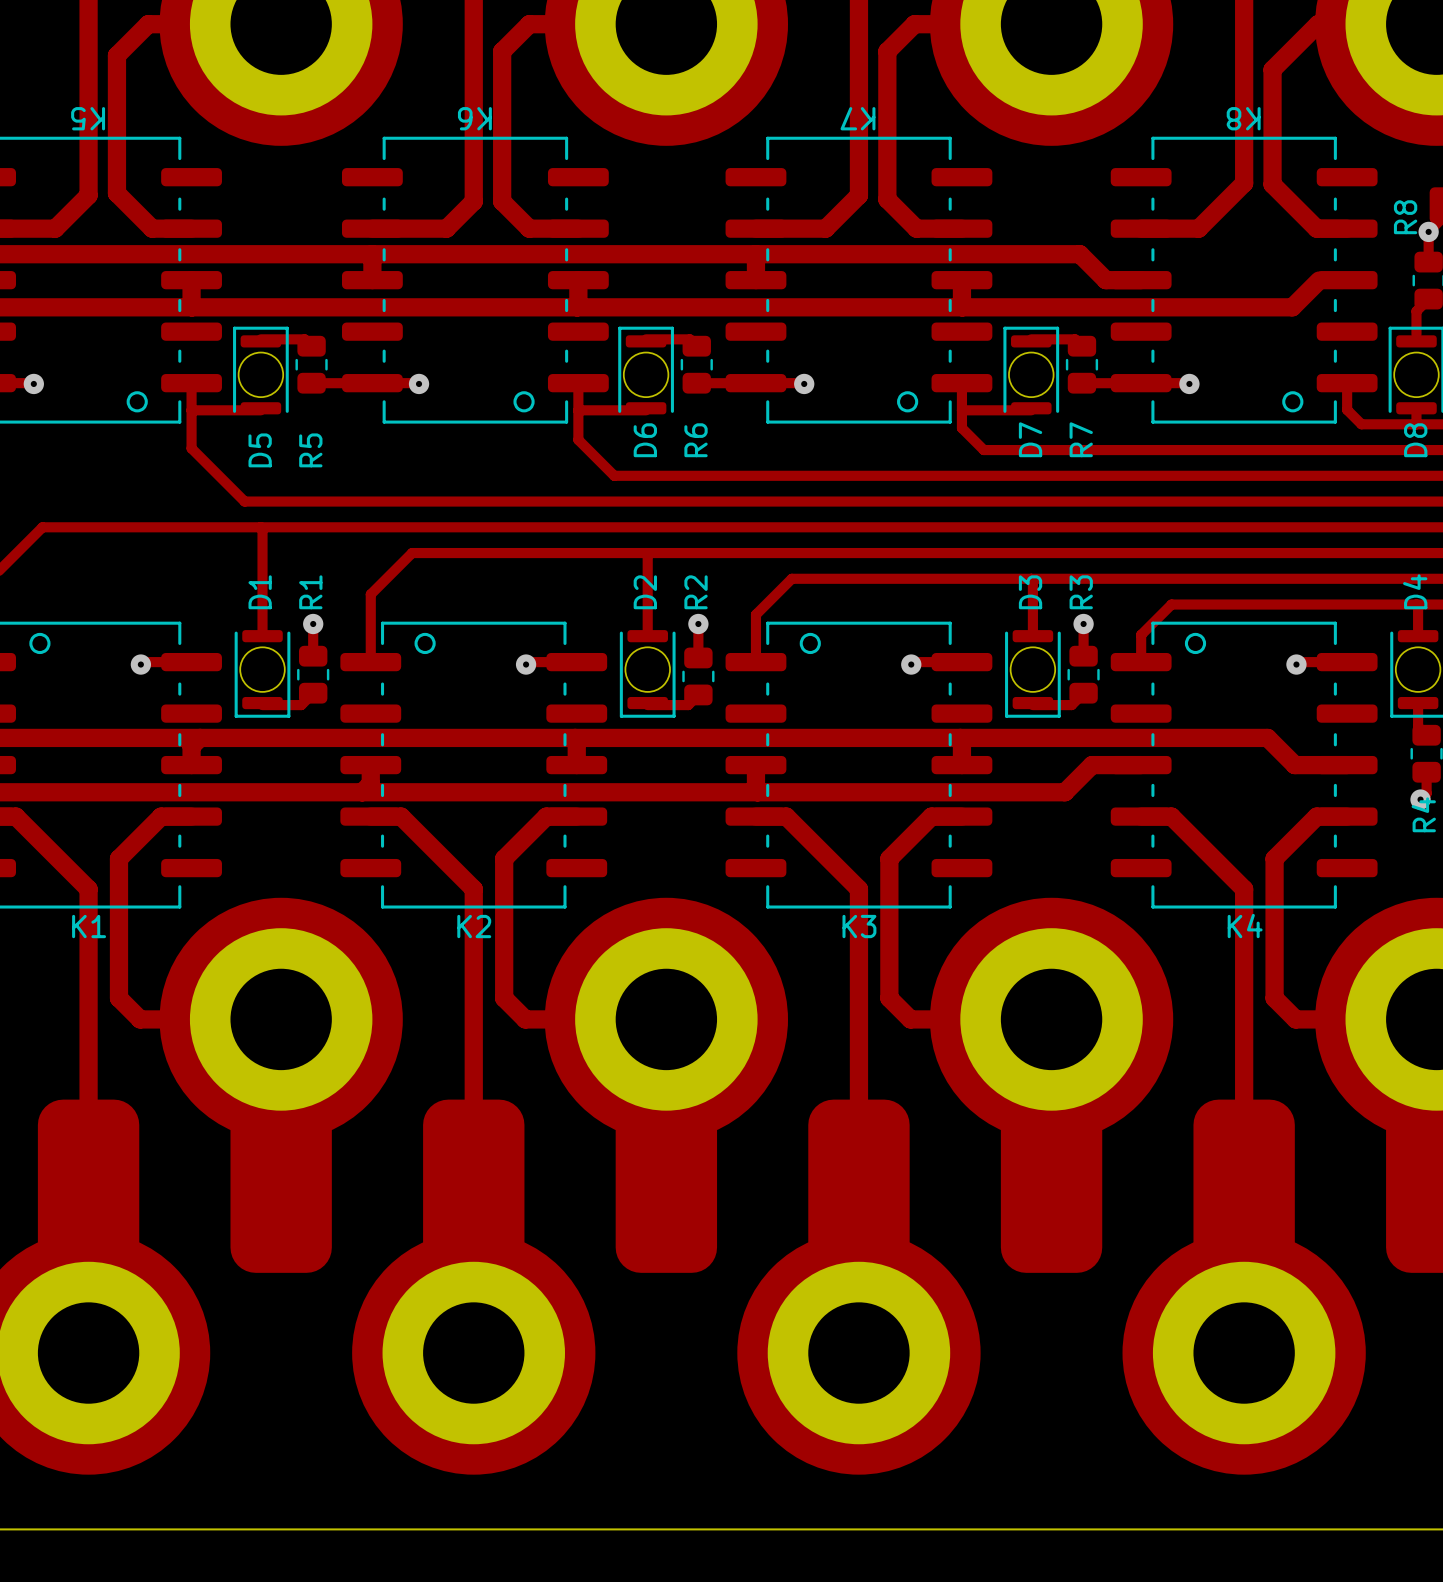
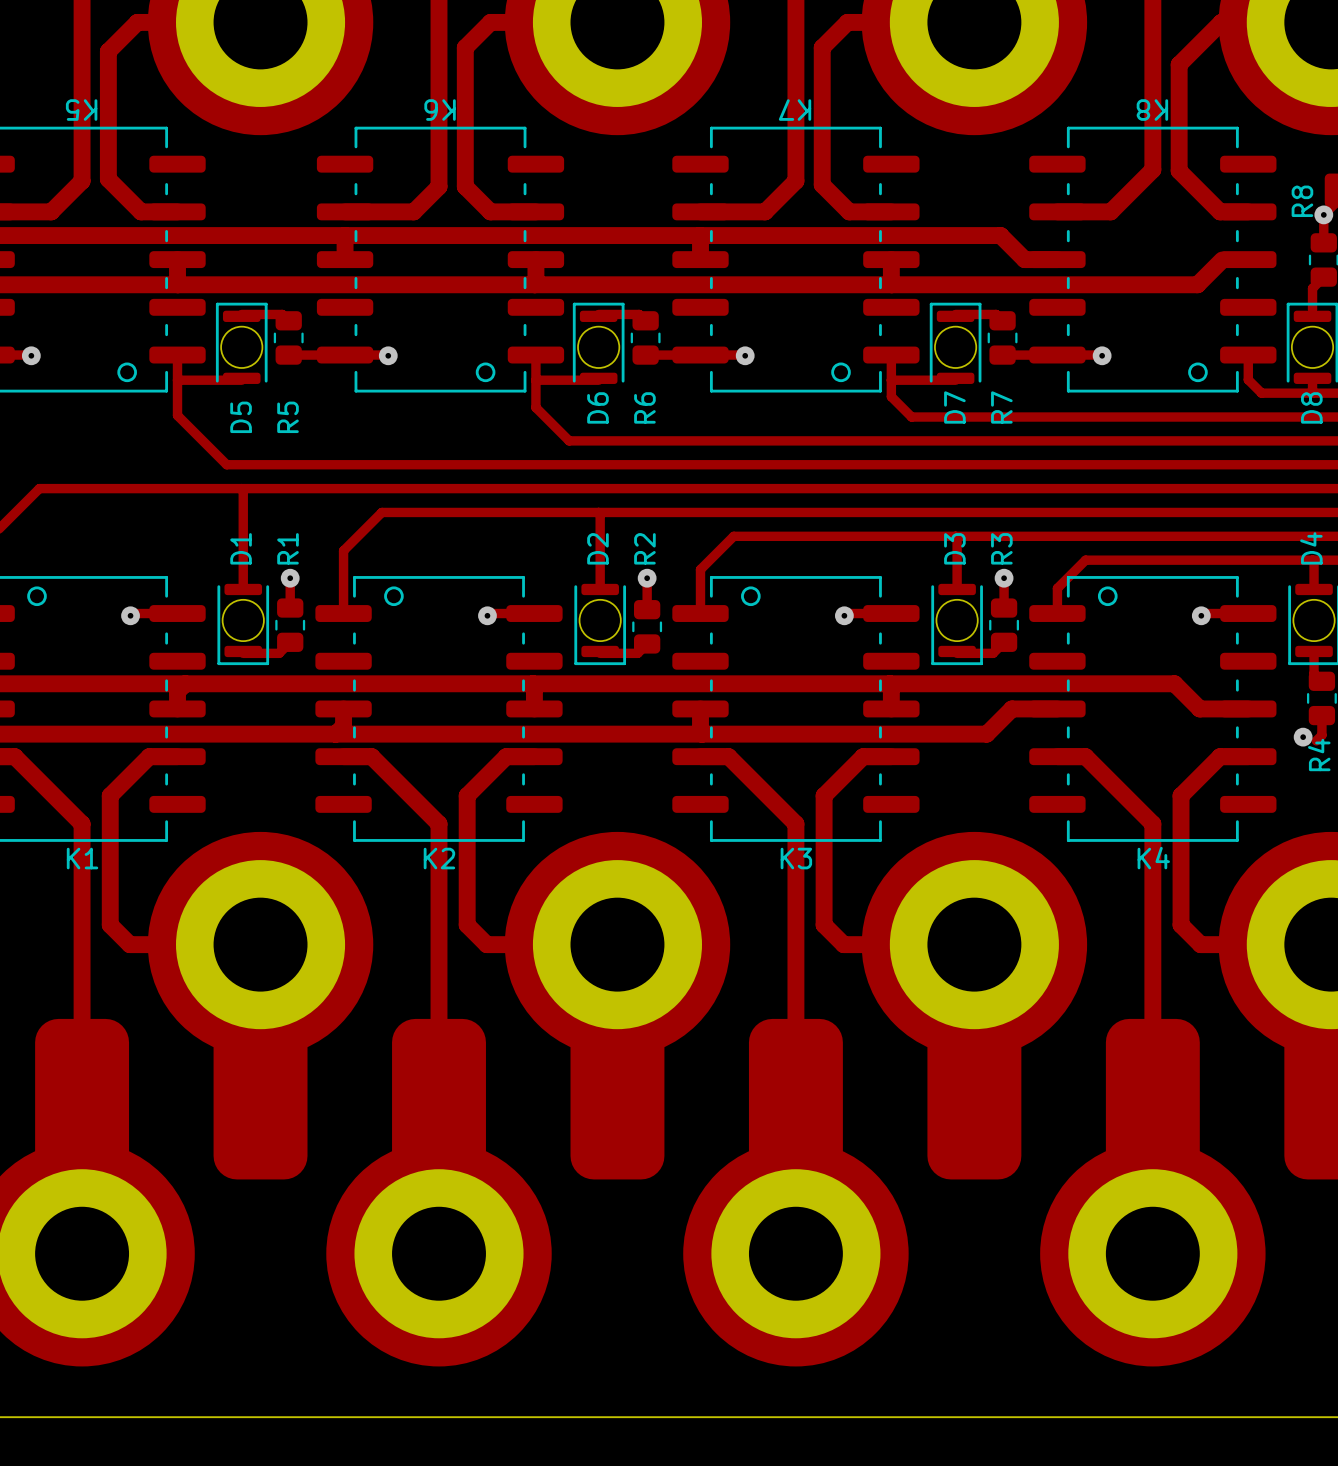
via position: (1420, 799) -> (1303, 737)

